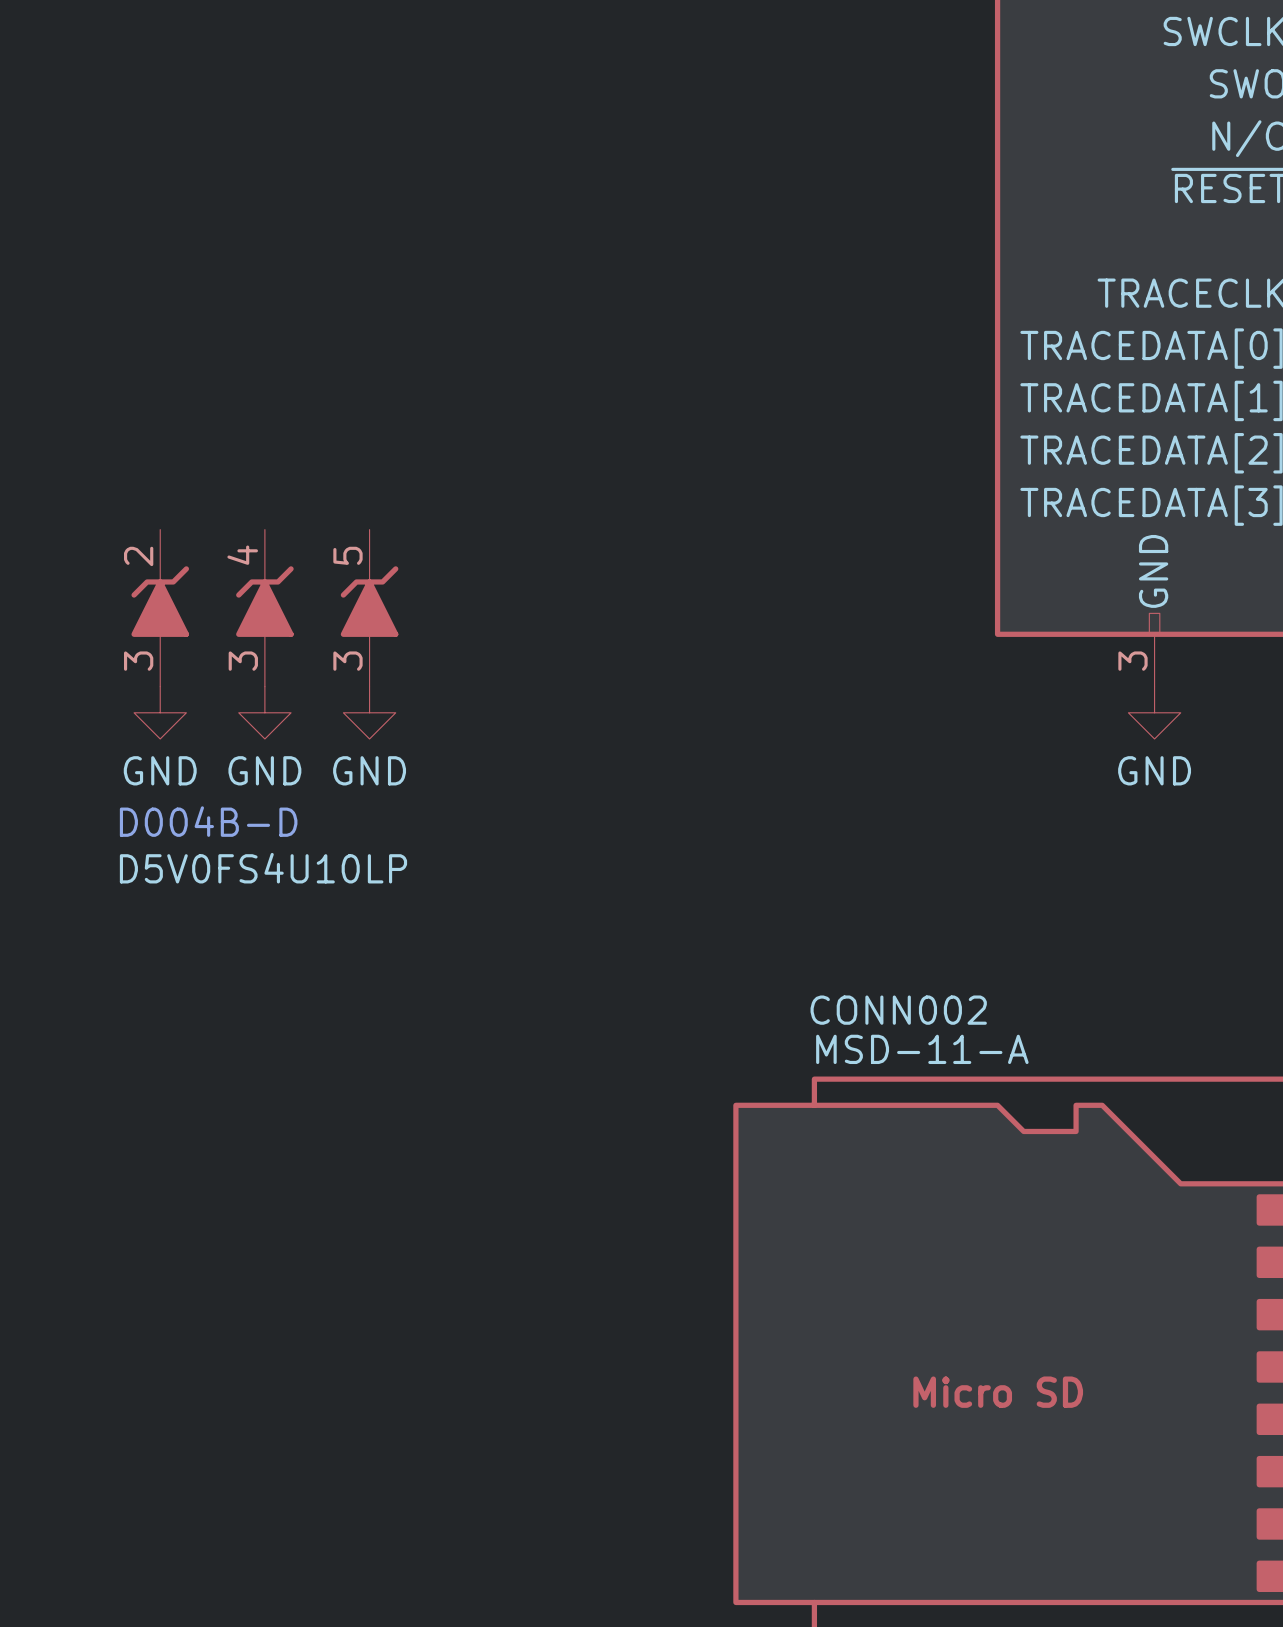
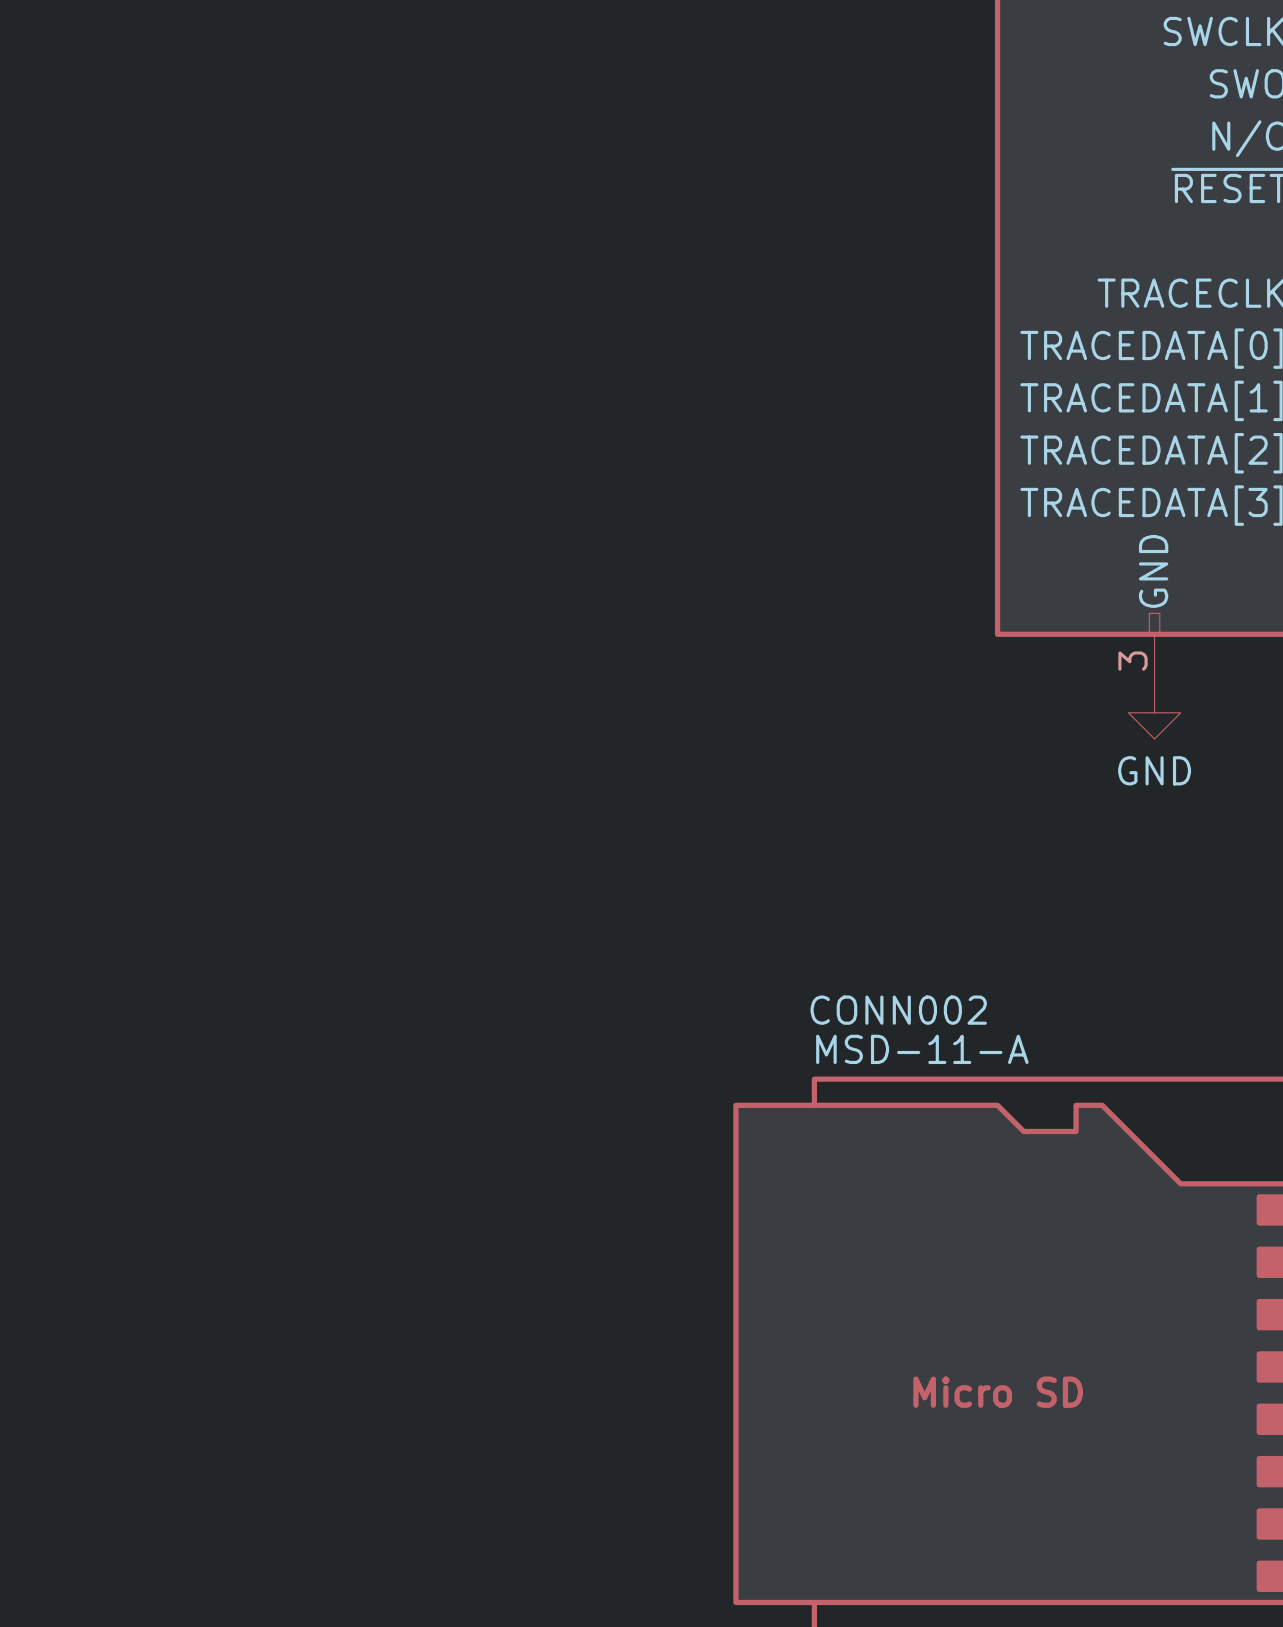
part: D5V0FS4U10LP (160, 608) -> none
part: (264, 608) -> none
part: (369, 608) -> none
power symbol: GND (160, 712) -> none
power symbol: GND (264, 712) -> none
power symbol: GND (369, 712) -> none
text: D004B-D (208, 821) -> none

